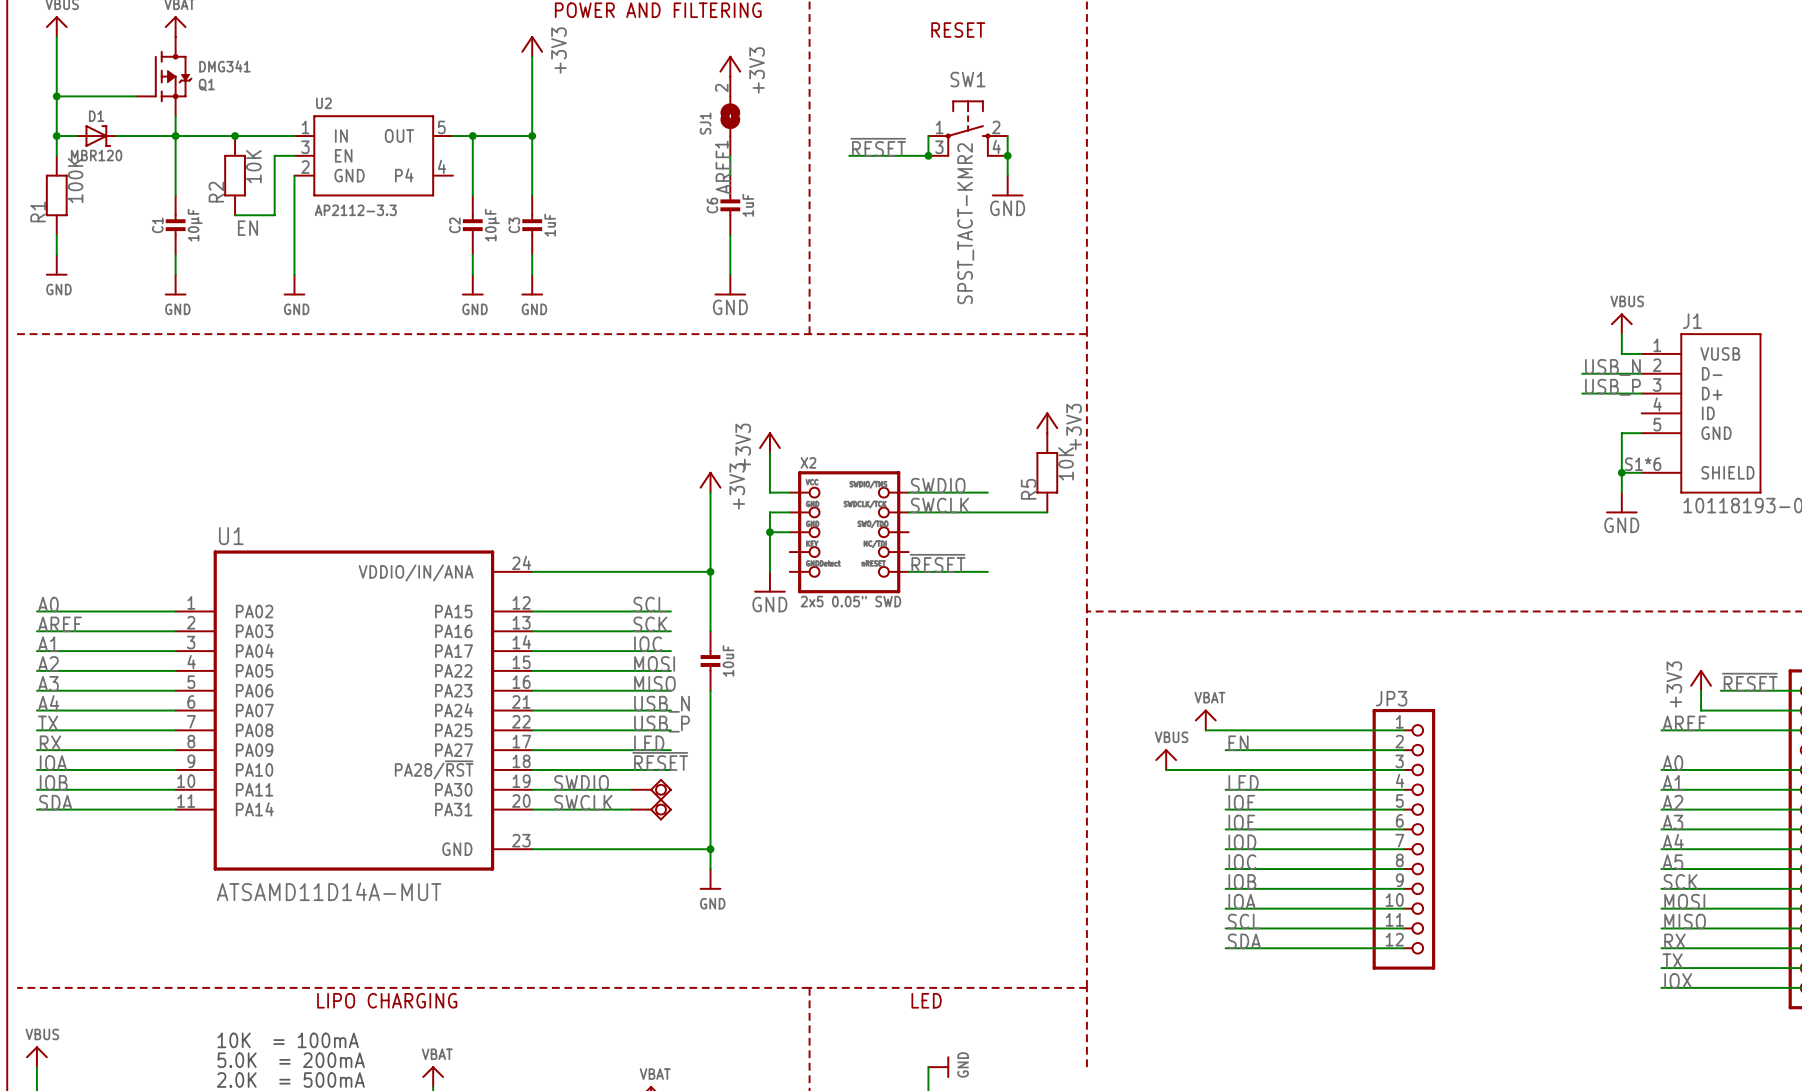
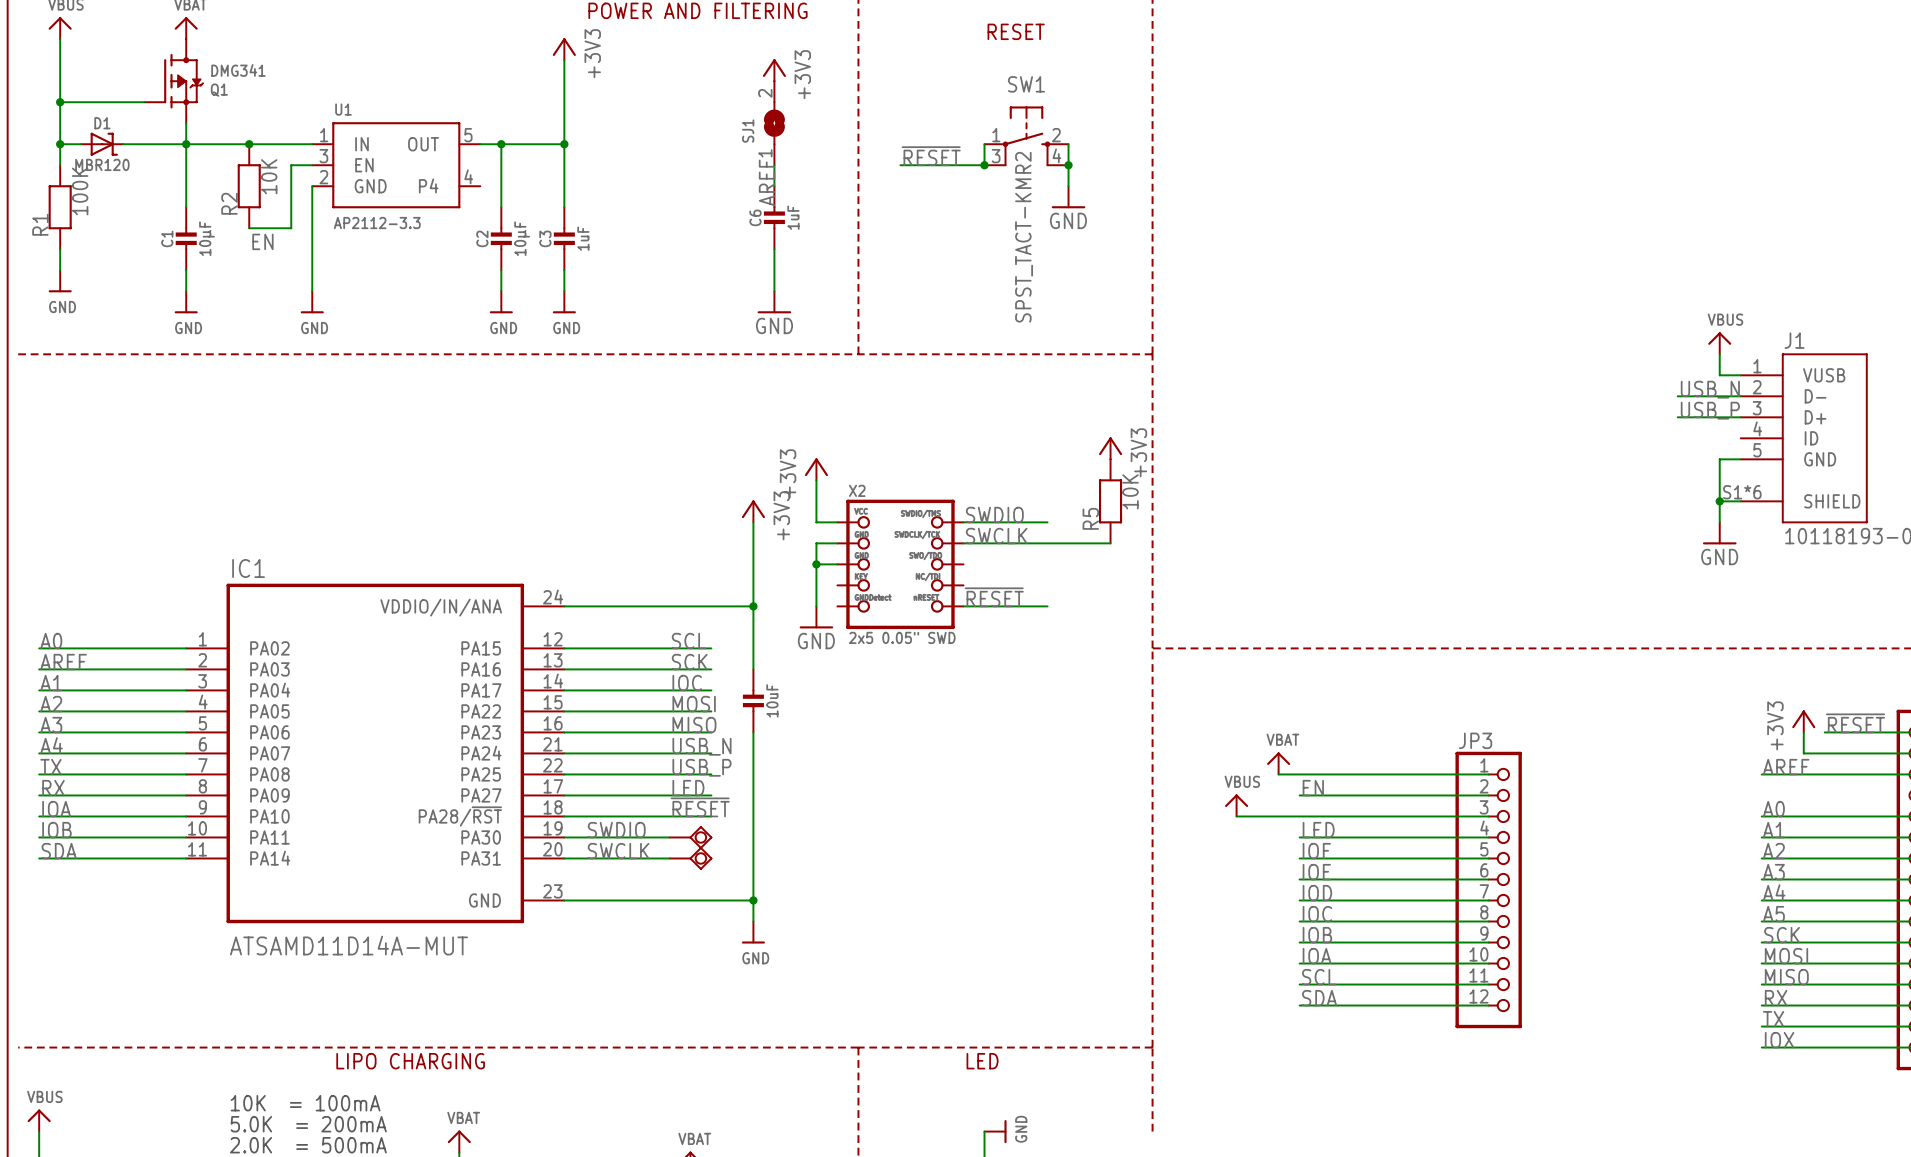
U2 name: U2 (323, 103) -> U1 (343, 109)
U1 name: U1 (231, 536) -> IC1 (248, 568)

